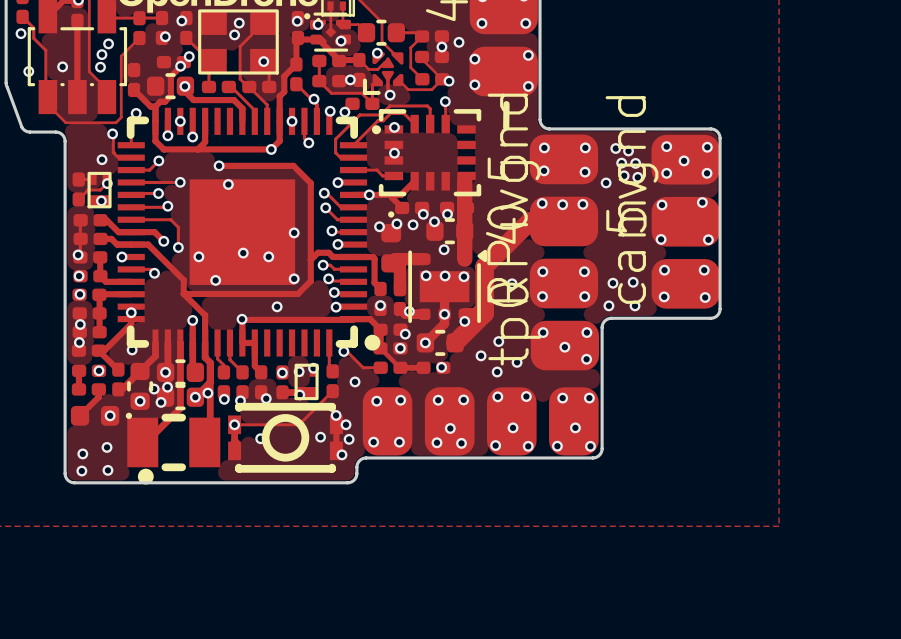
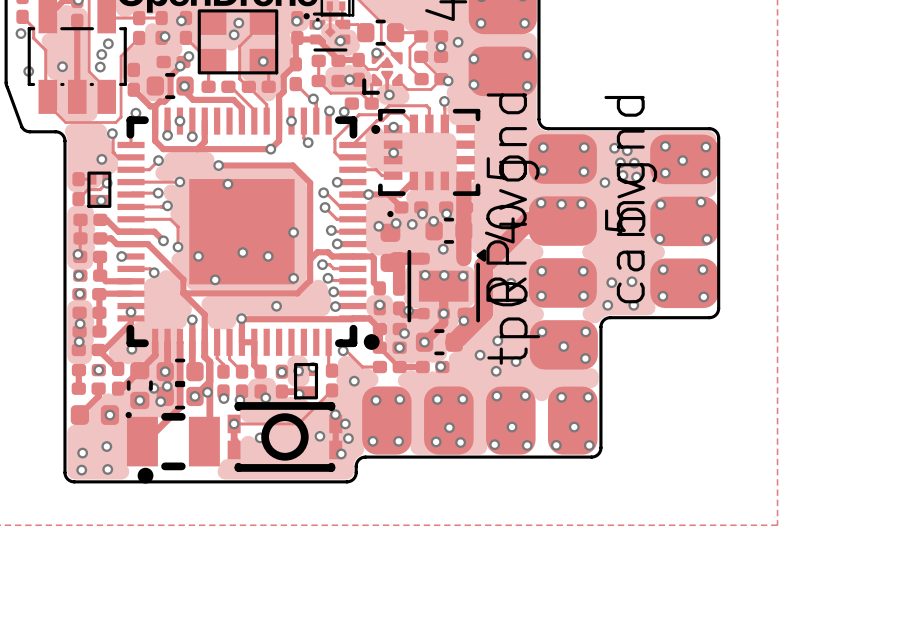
line: (506, 104) (506, 127) -> none

